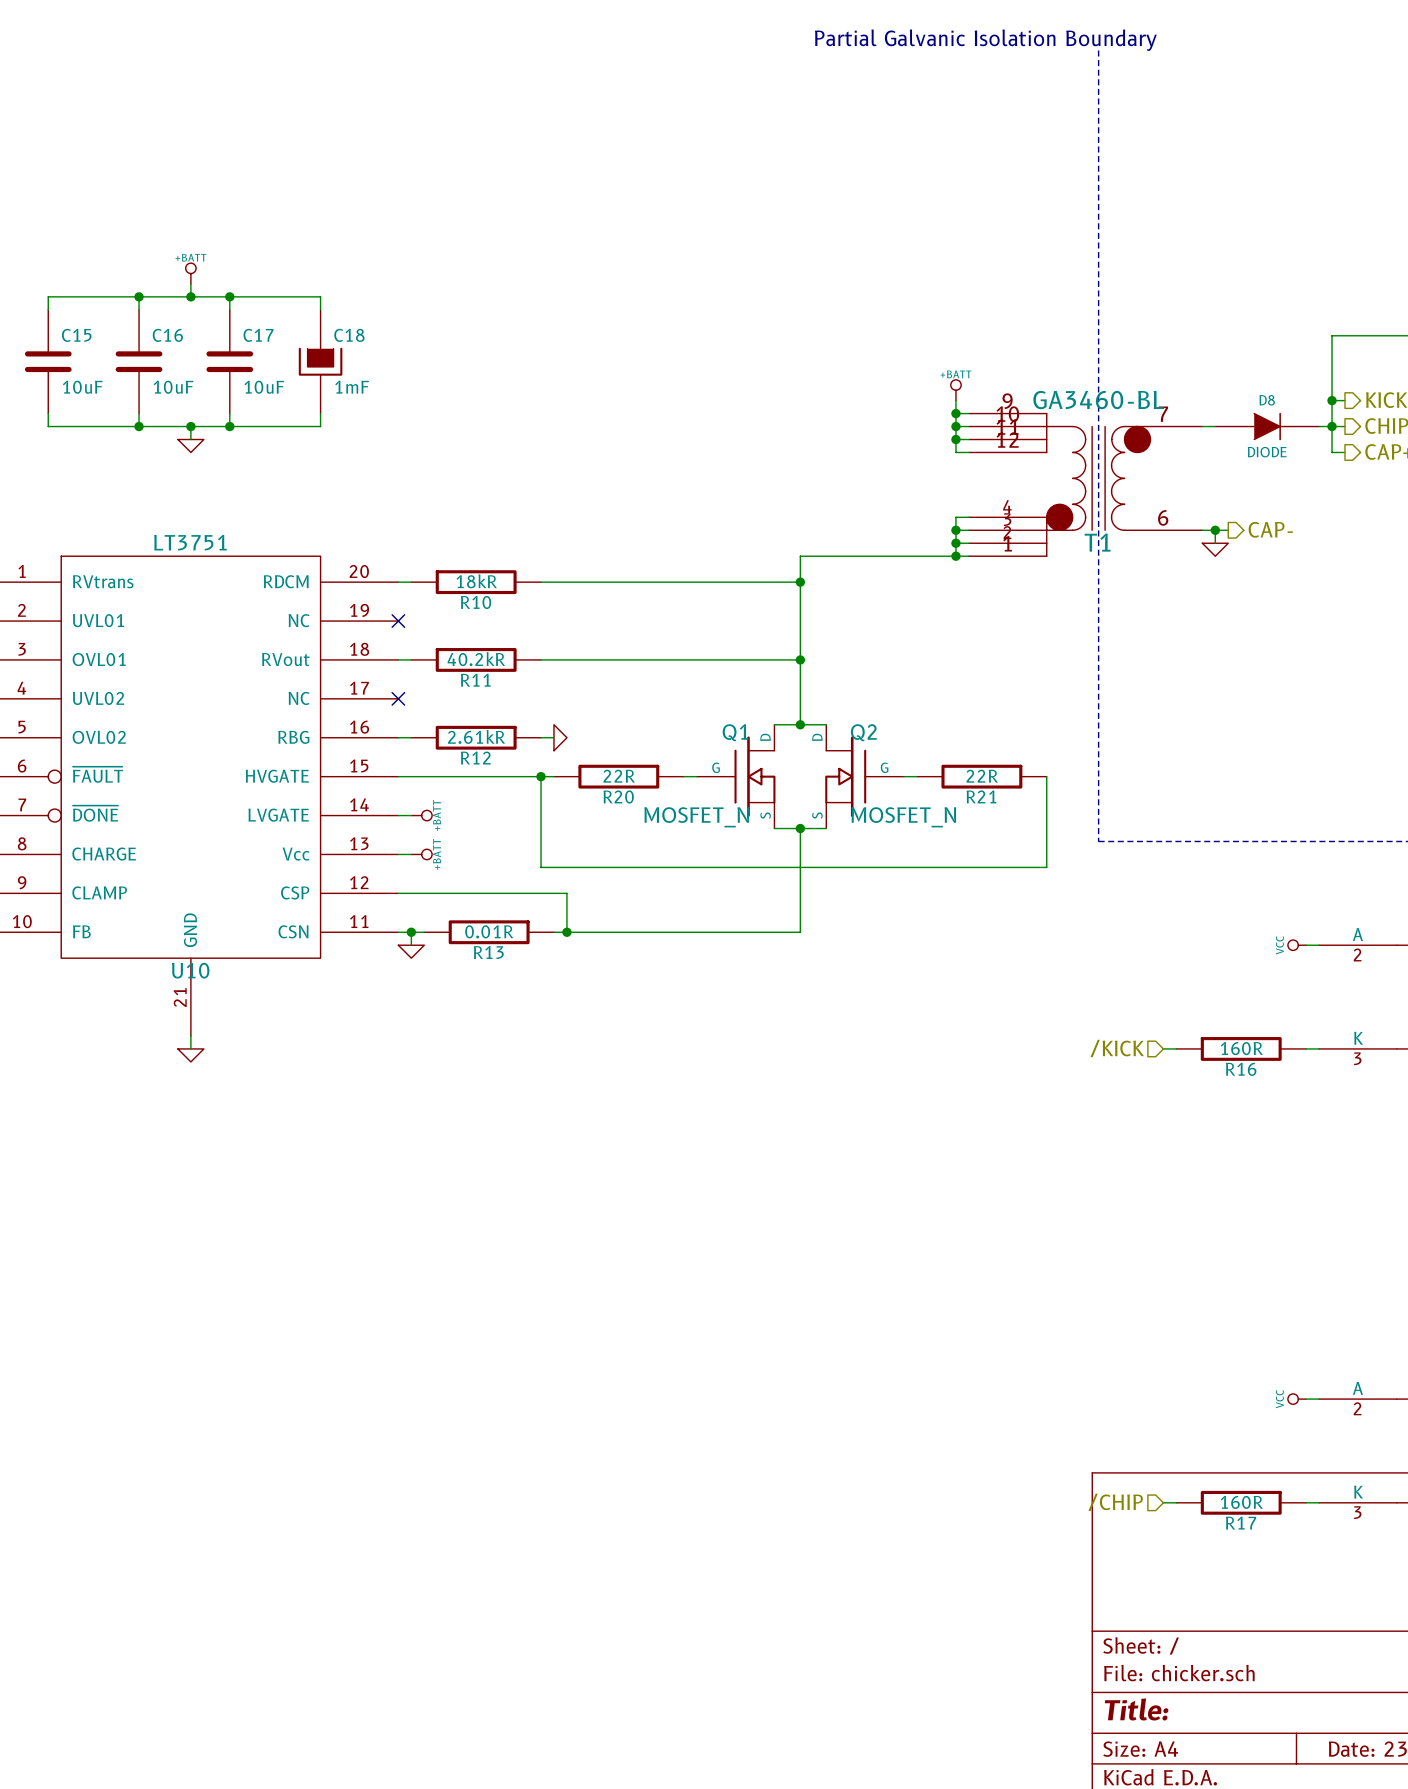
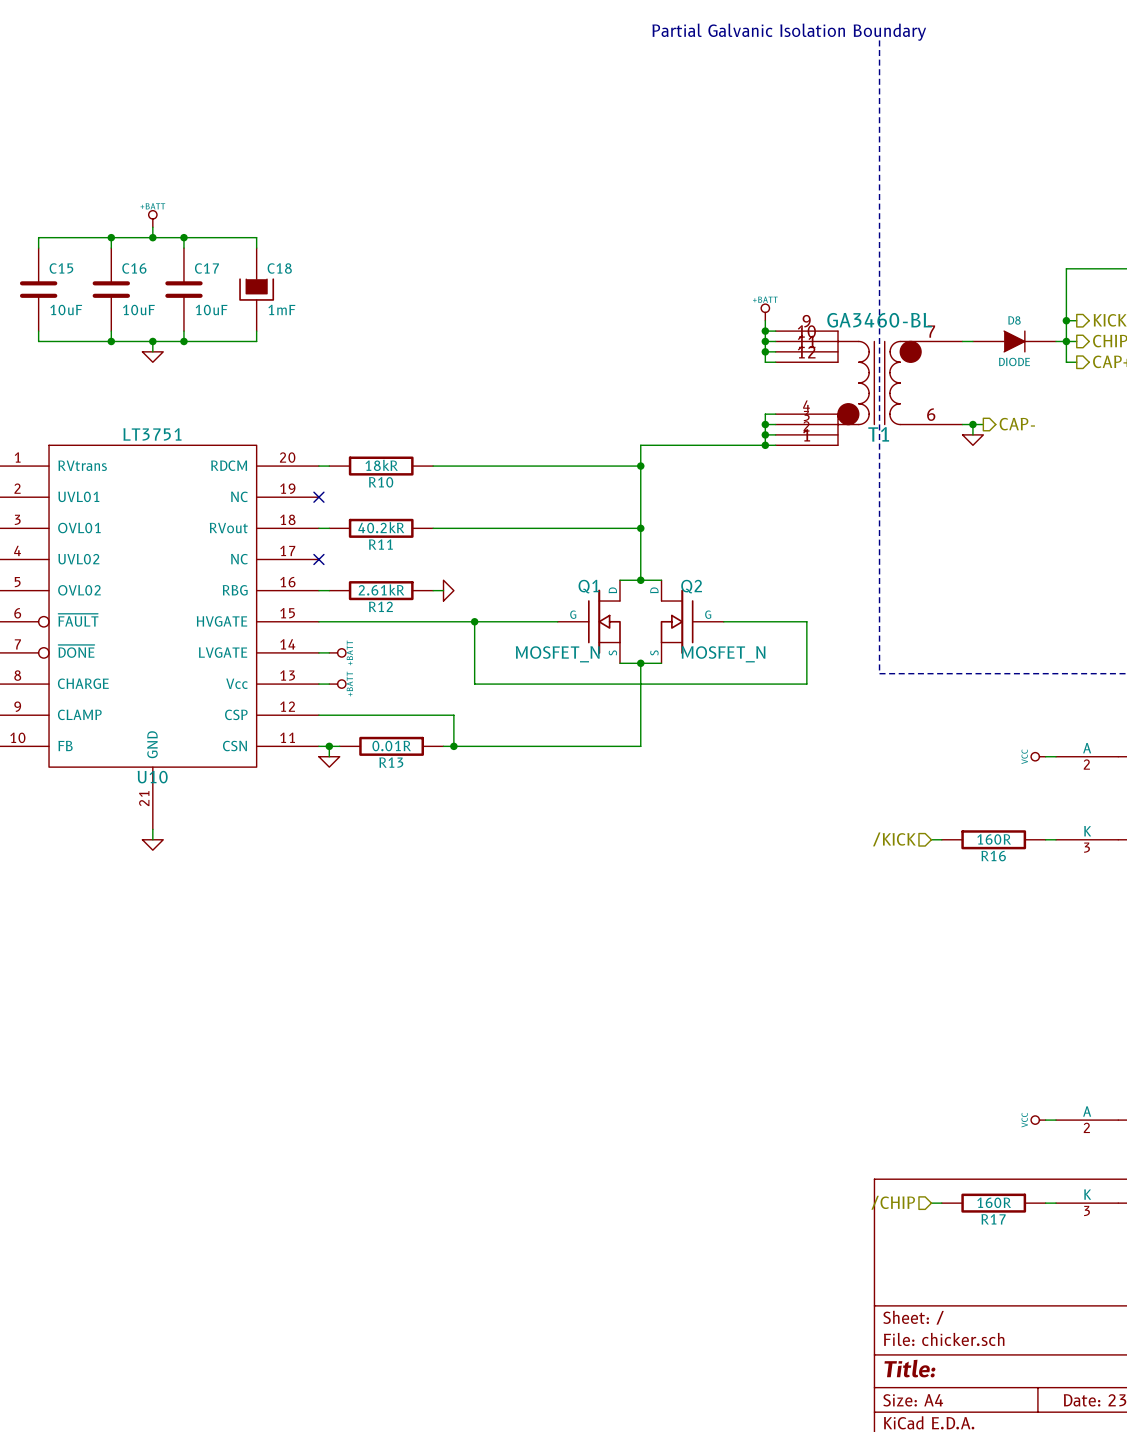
wire: (541, 776) (541, 867) (1046, 867) (1046, 776) -> none
junction position: (541, 776) -> (474, 621)
wire: none -> (443, 621) (547, 621)
wire: none -> (474, 621) (474, 684) (806, 684) (806, 621) (734, 621)
R20: 22R (618, 776) -> none
R21: 22R (981, 776) -> none

